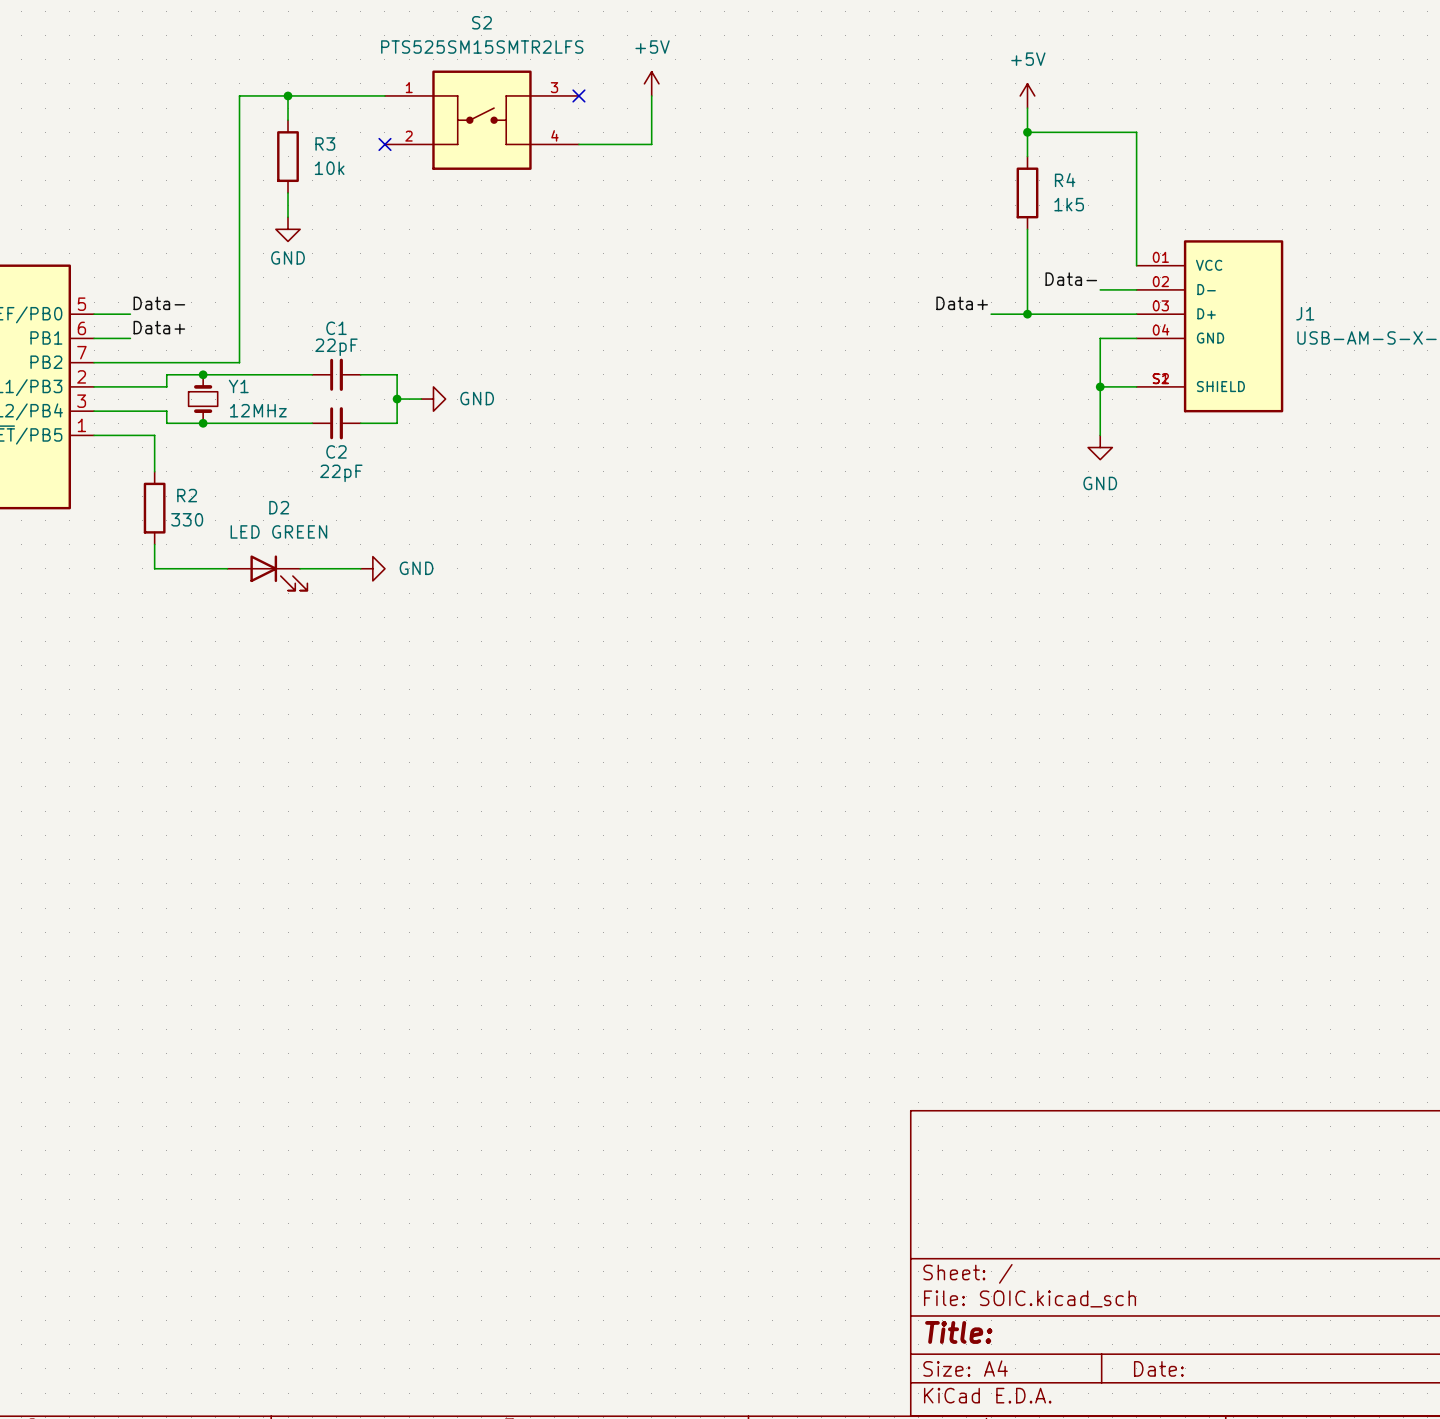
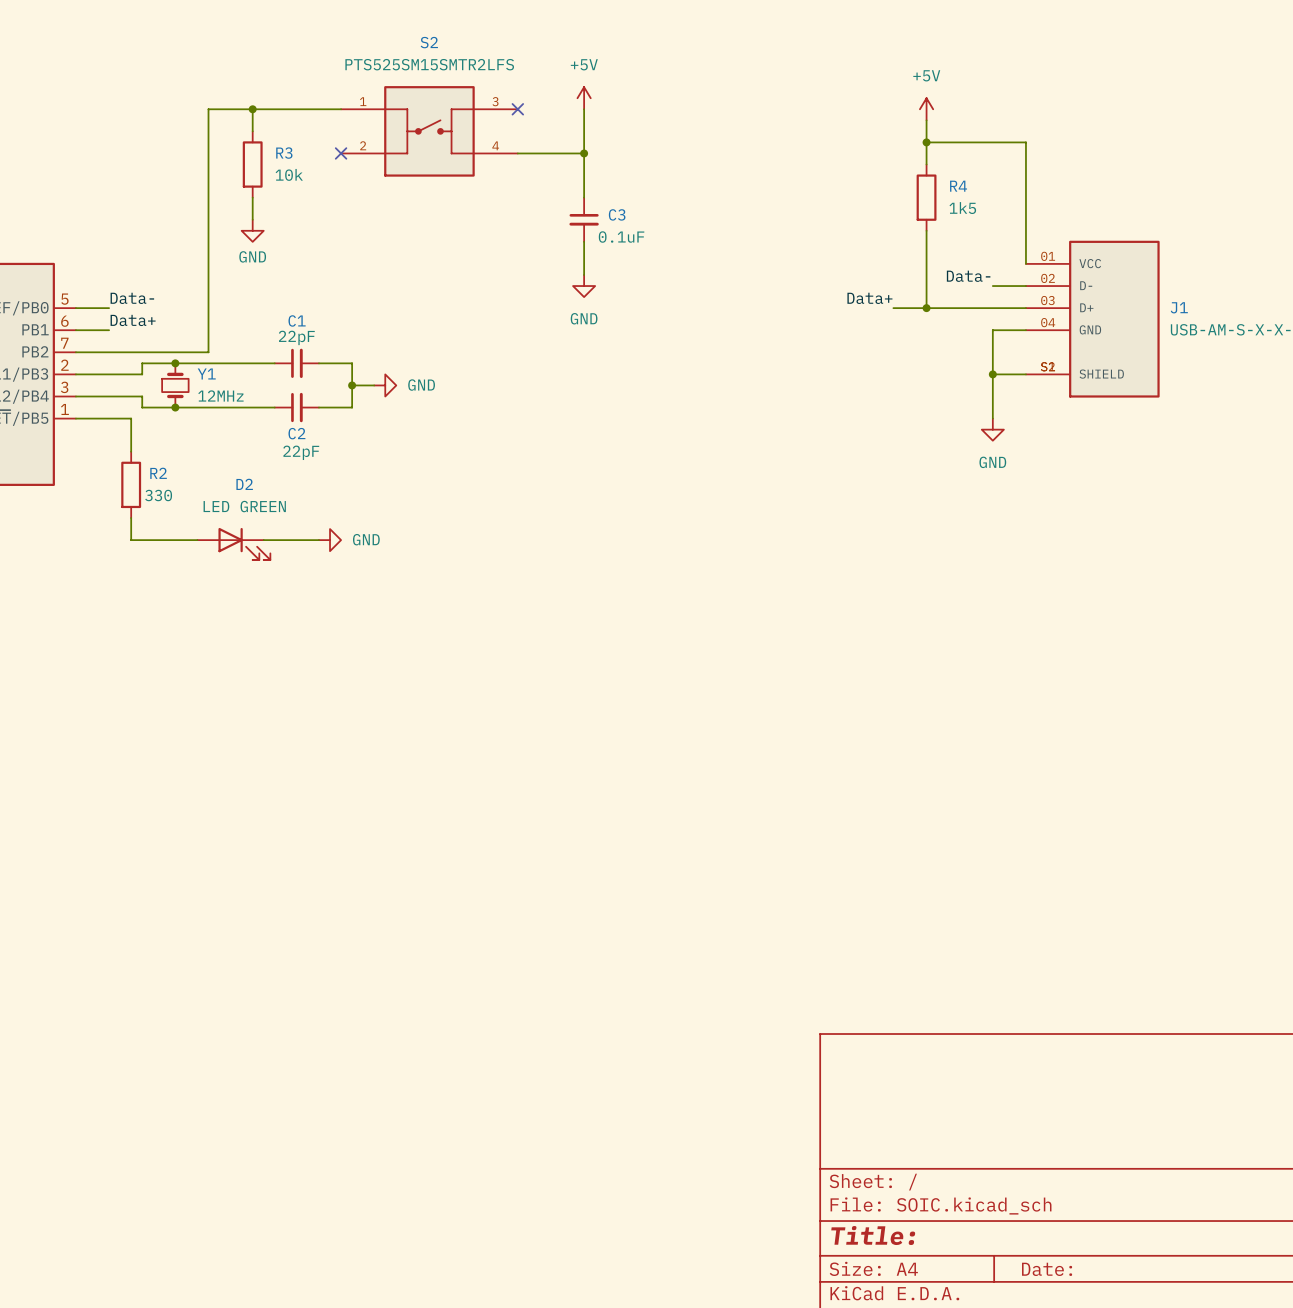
wire: none -> (584, 153) (584, 197)
junction: none -> (584, 153)
C3: none -> 0.1uF (584, 219)
wire: none -> (584, 241) (584, 274)
power symbol: none -> GND (584, 286)

